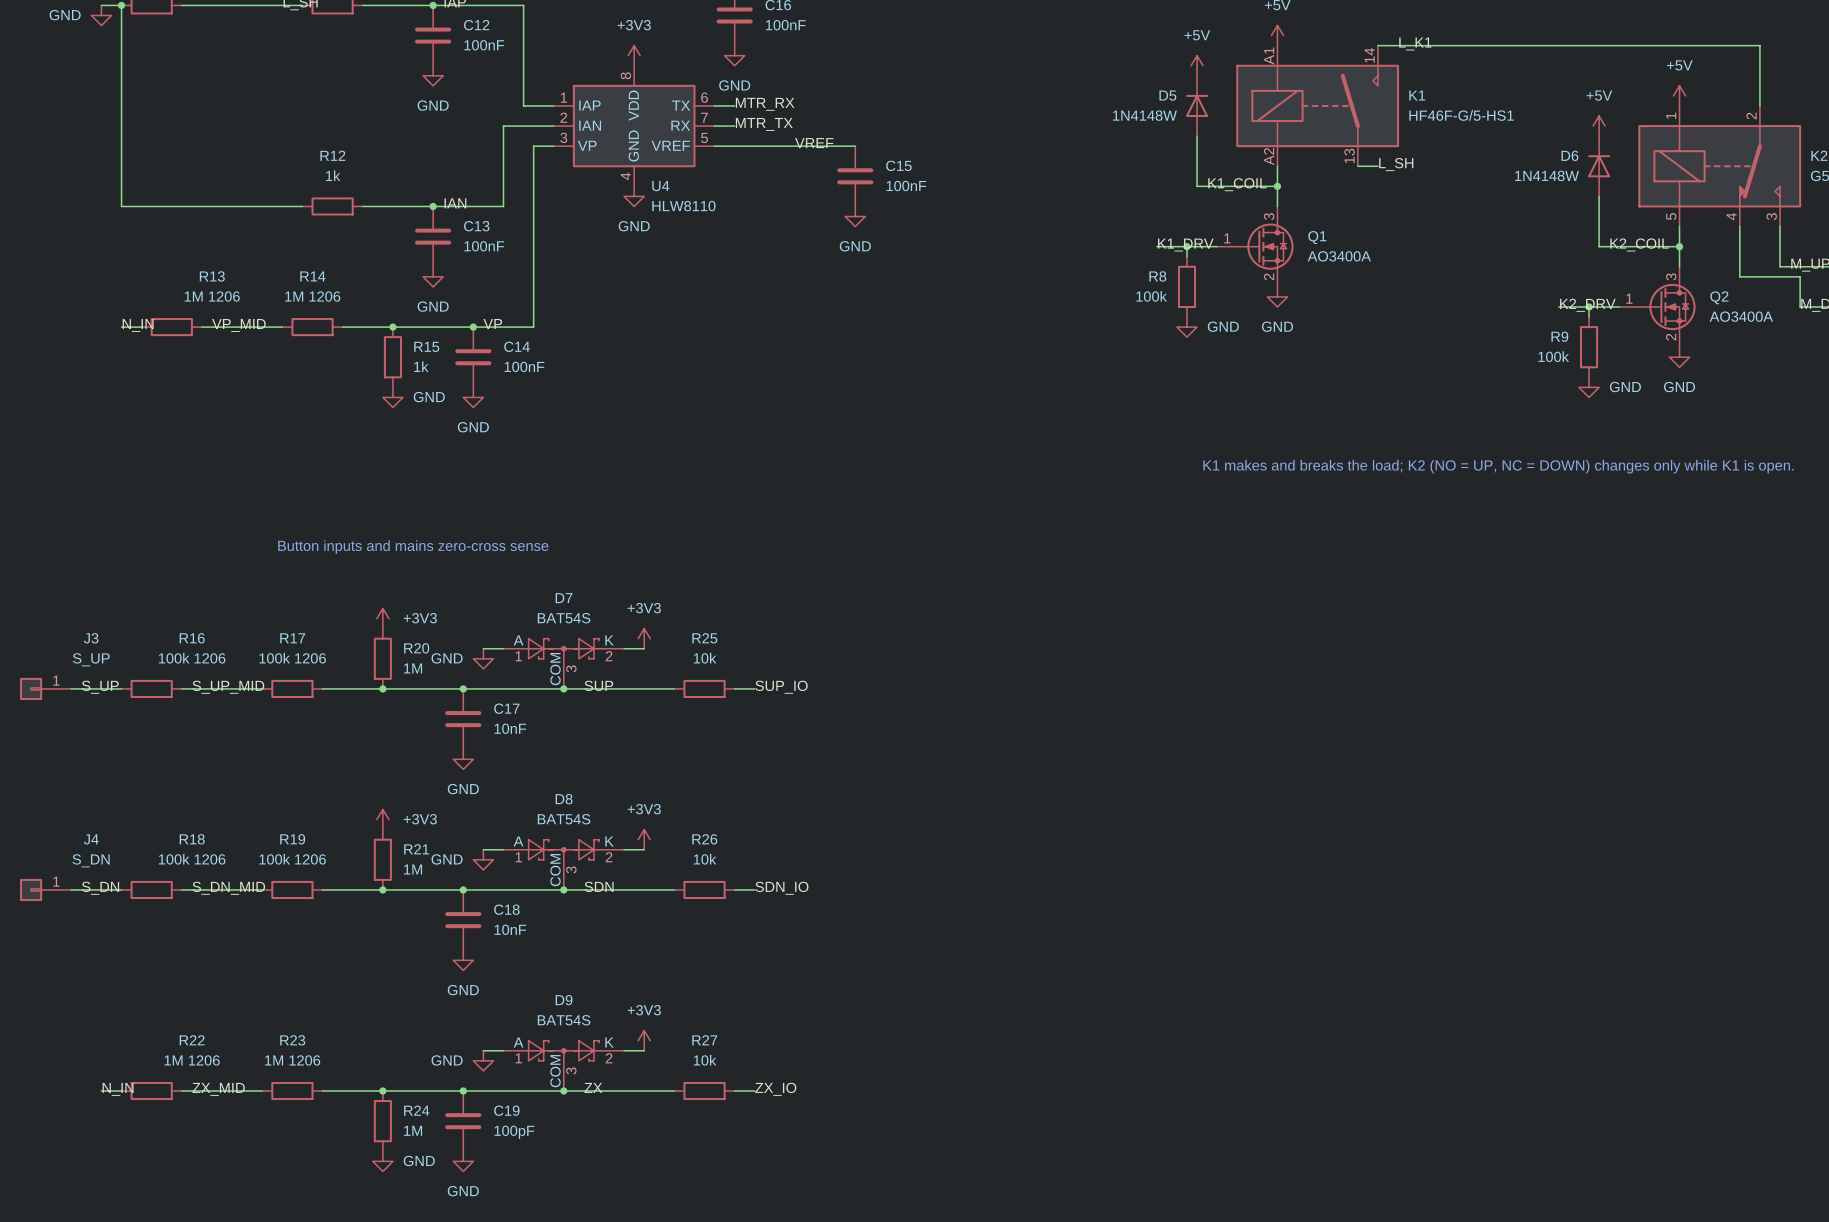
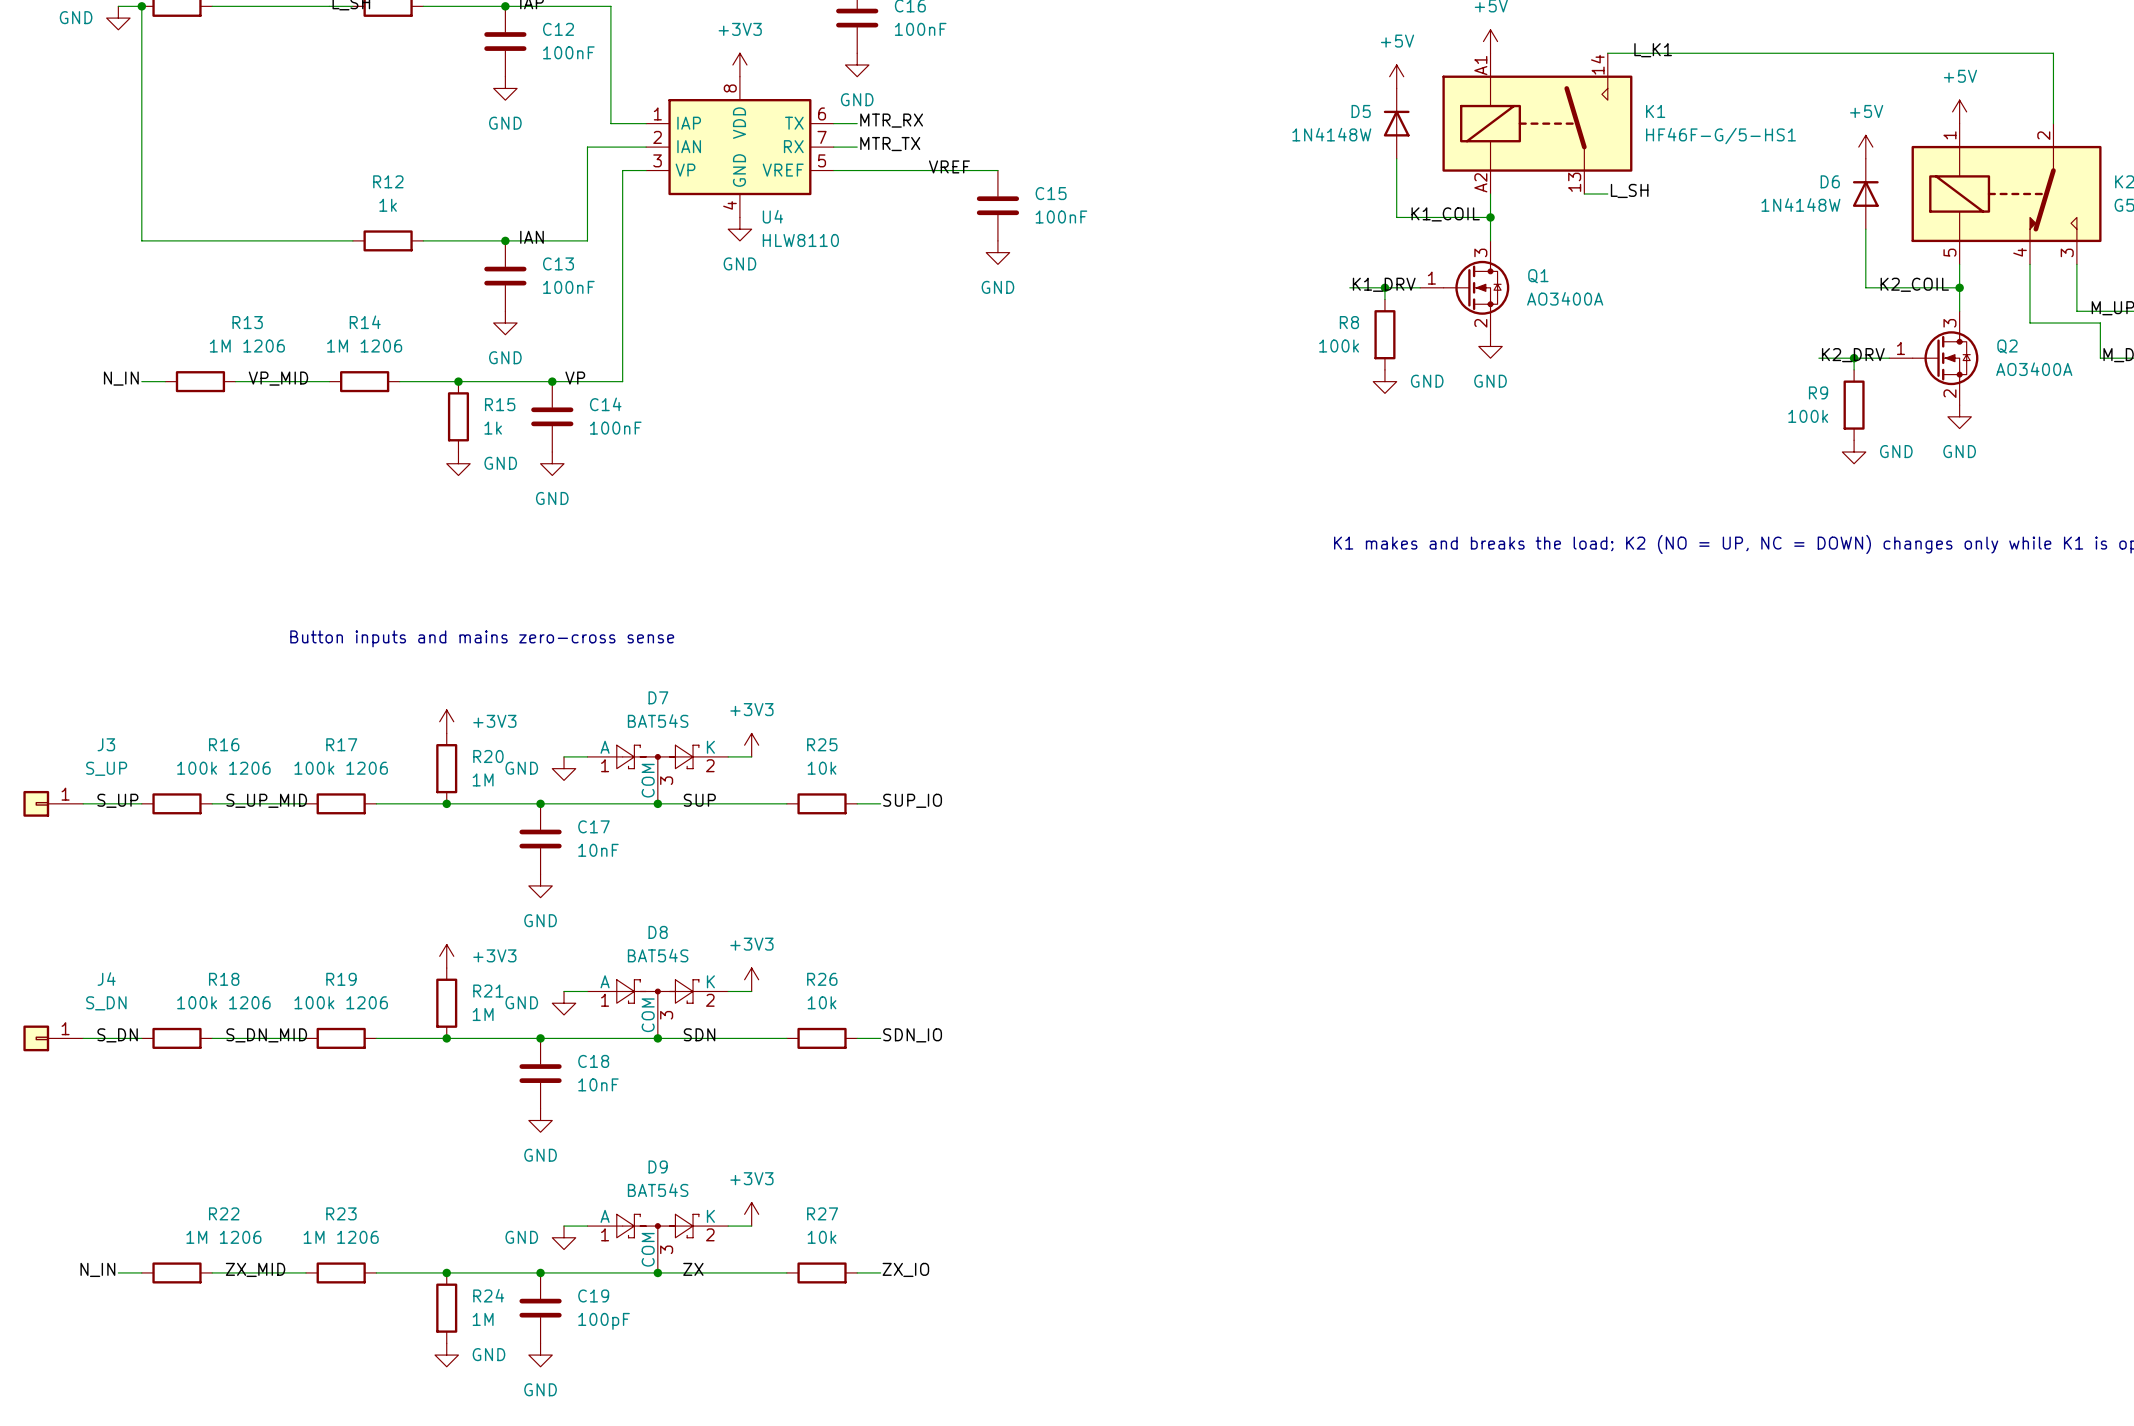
label position: N_IN (138, 325) -> N_IN (121, 378)
label position: N_IN (118, 1089) -> N_IN (97, 1269)

